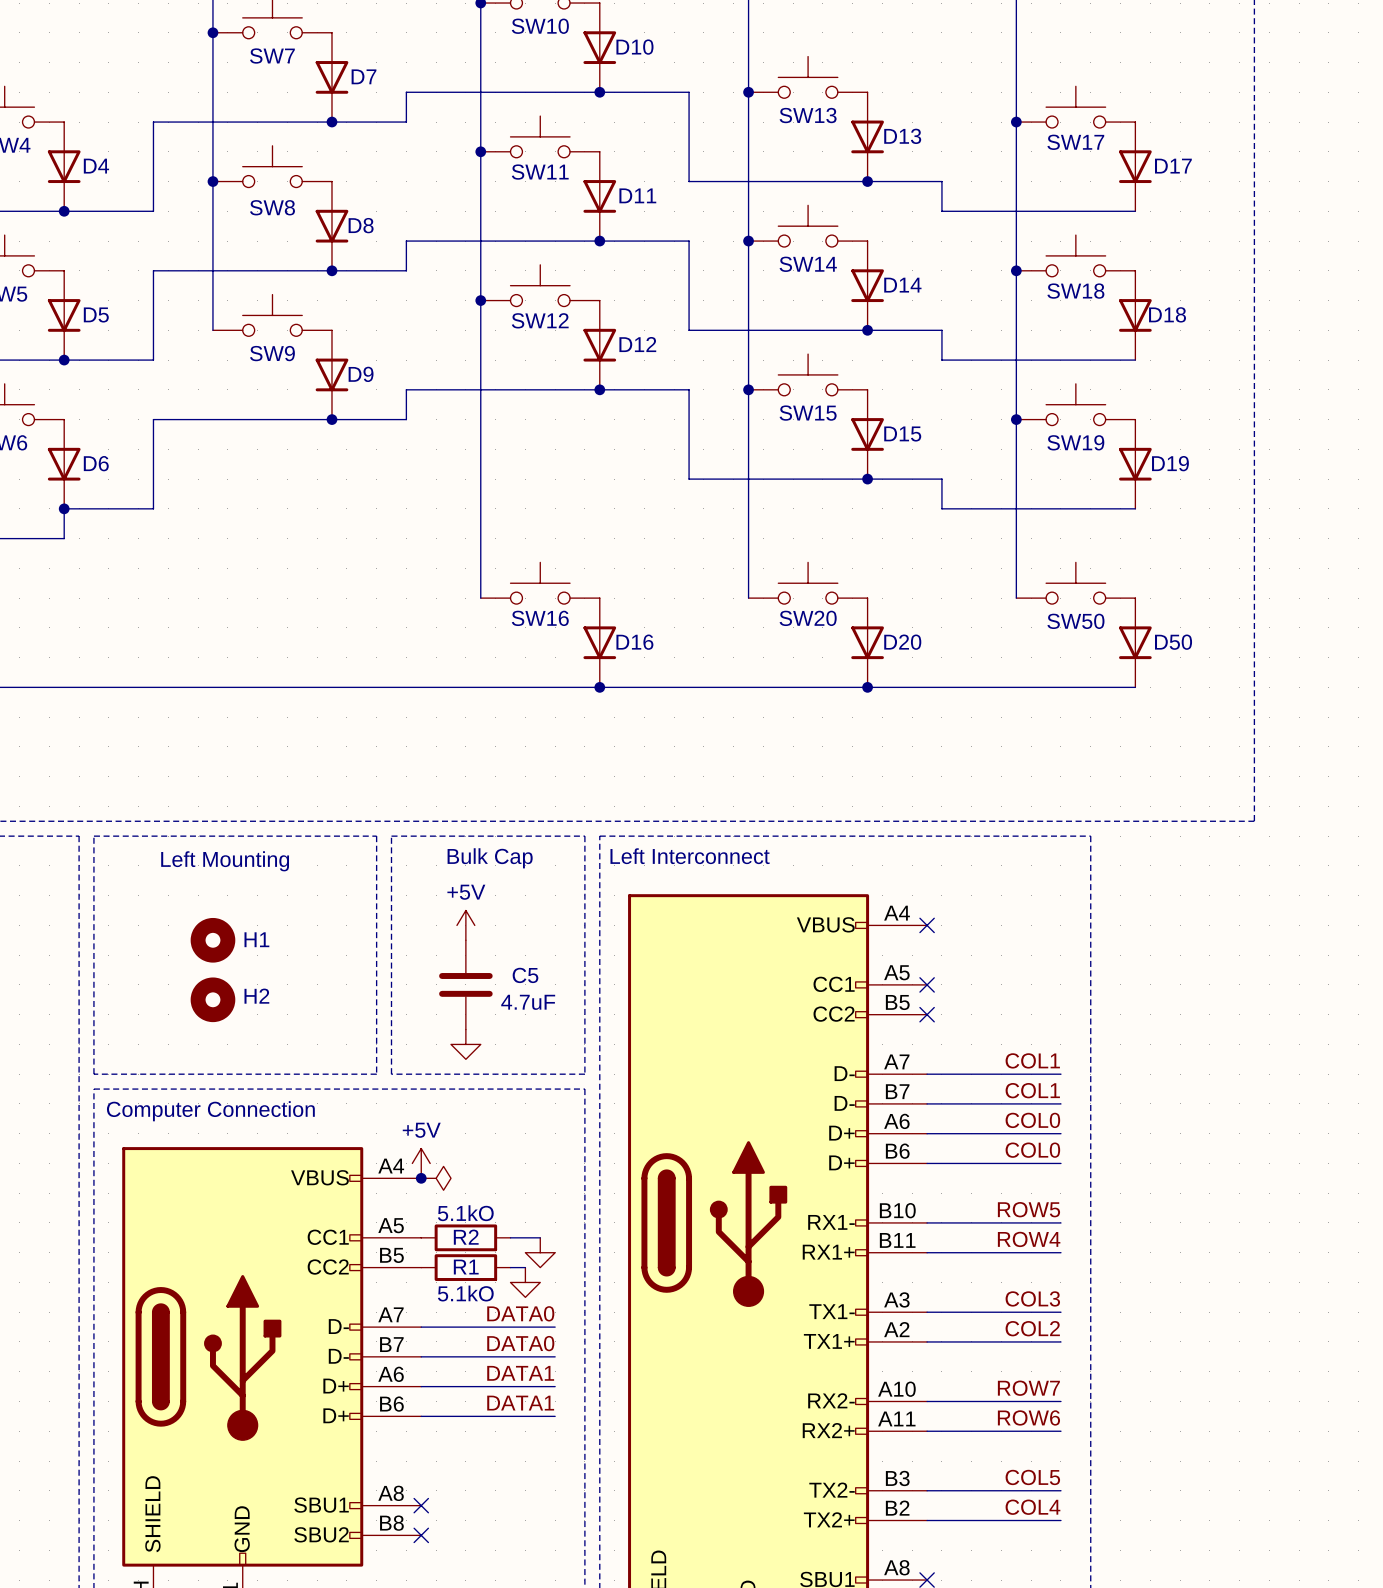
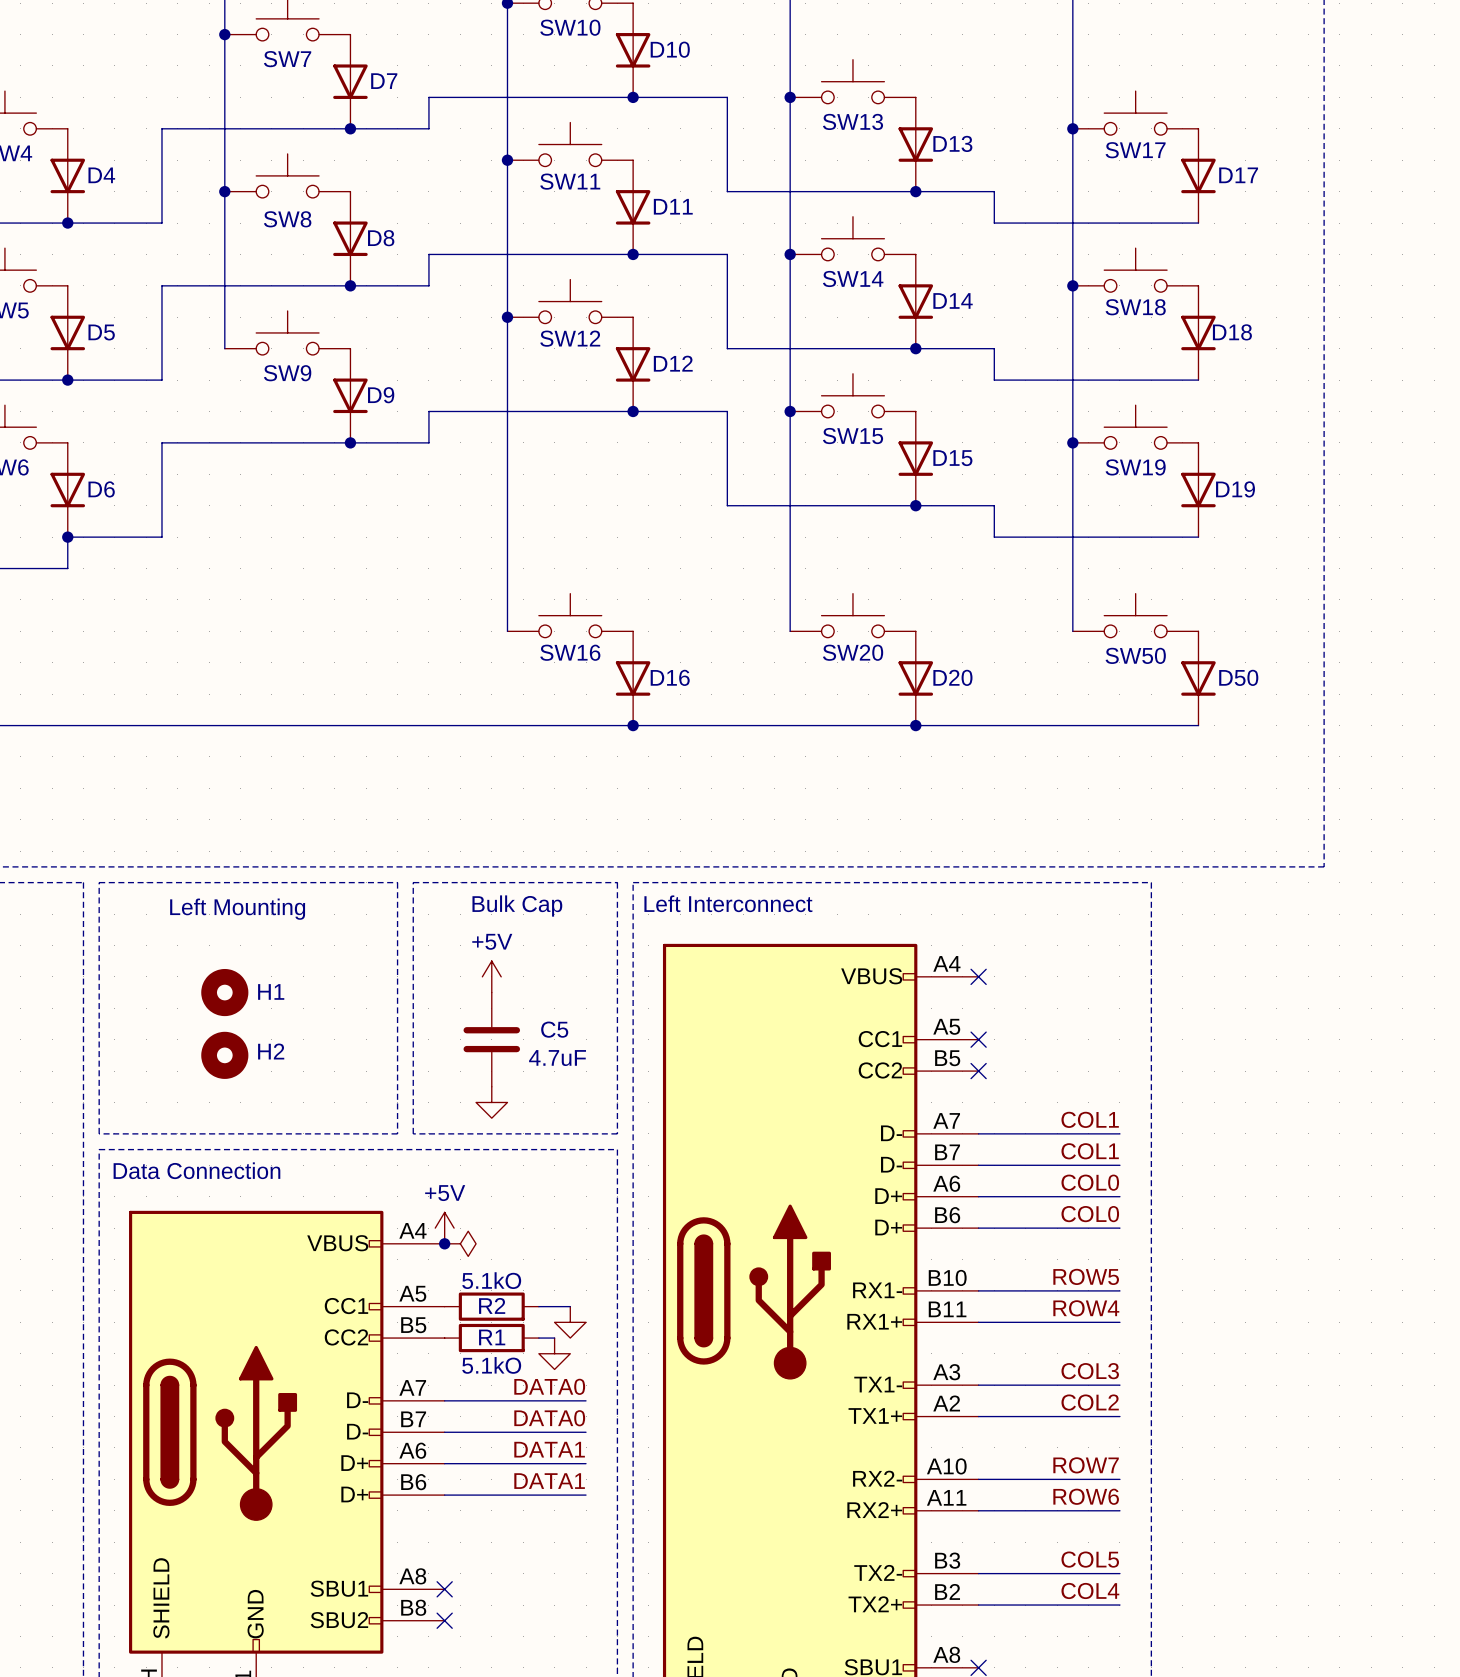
text: Computer Connection (210, 1111) -> Data Connection (196, 1170)

